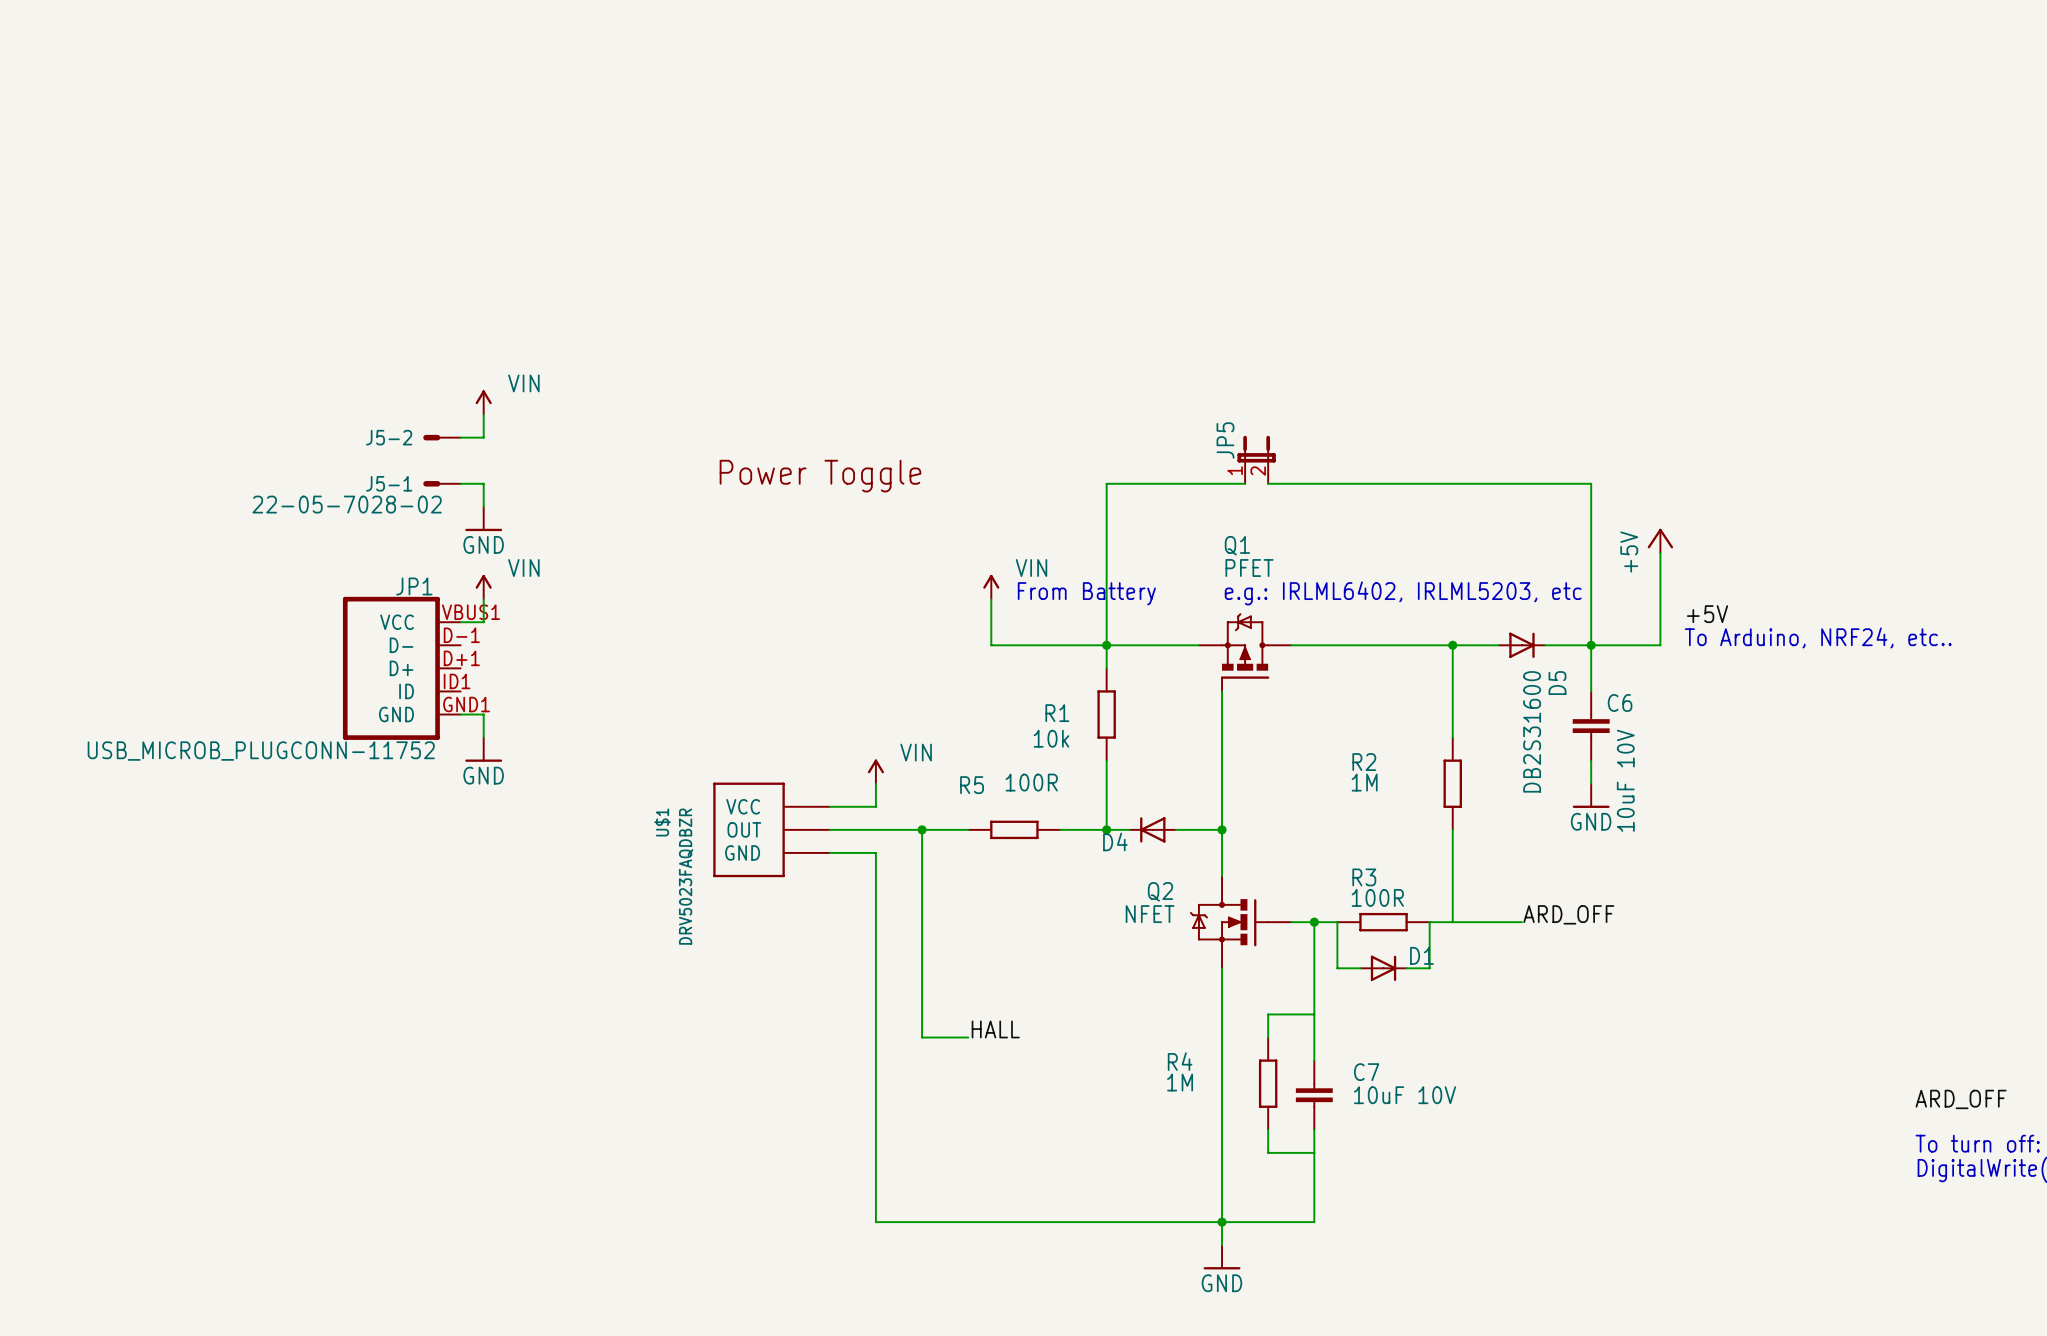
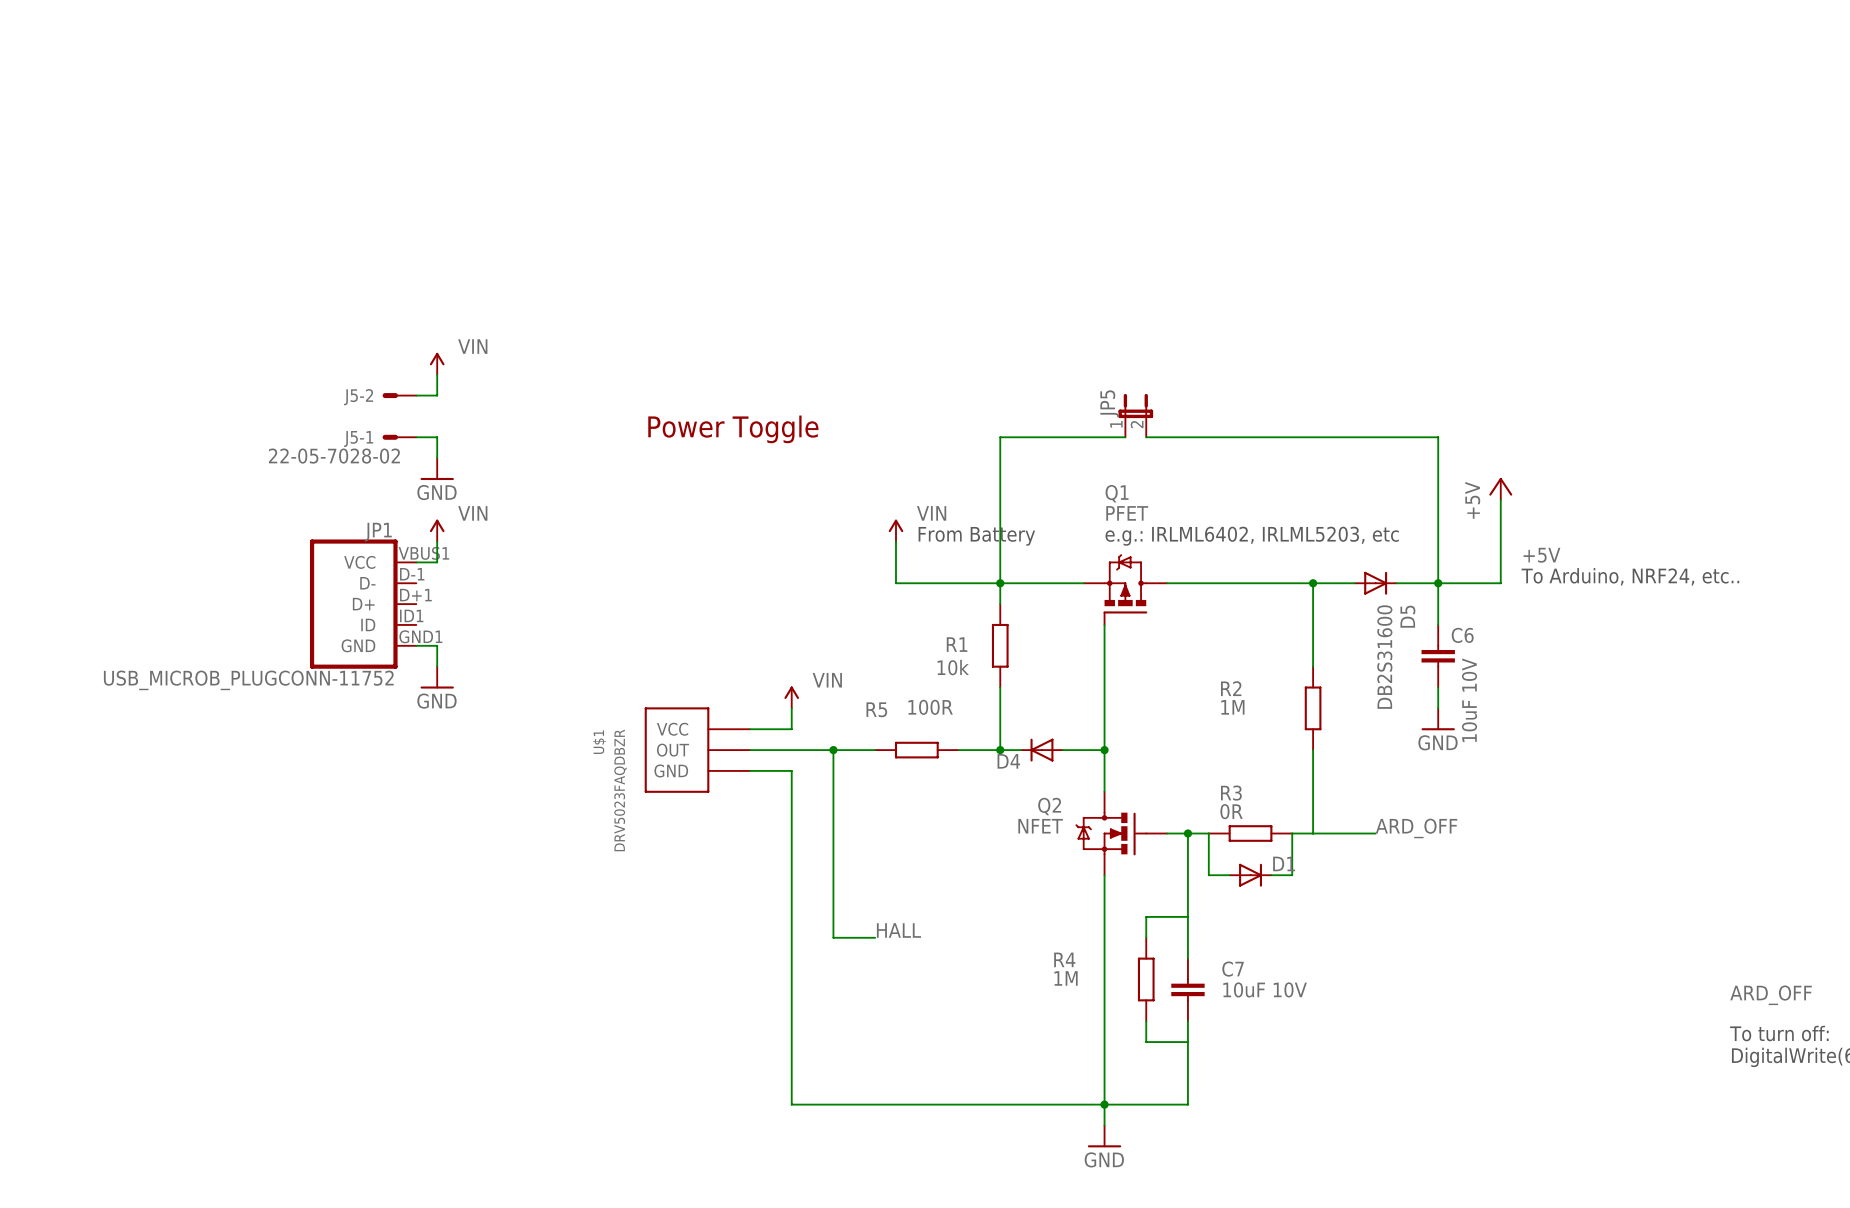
R3 value: 100R (1377, 897) -> 0R (1231, 811)

